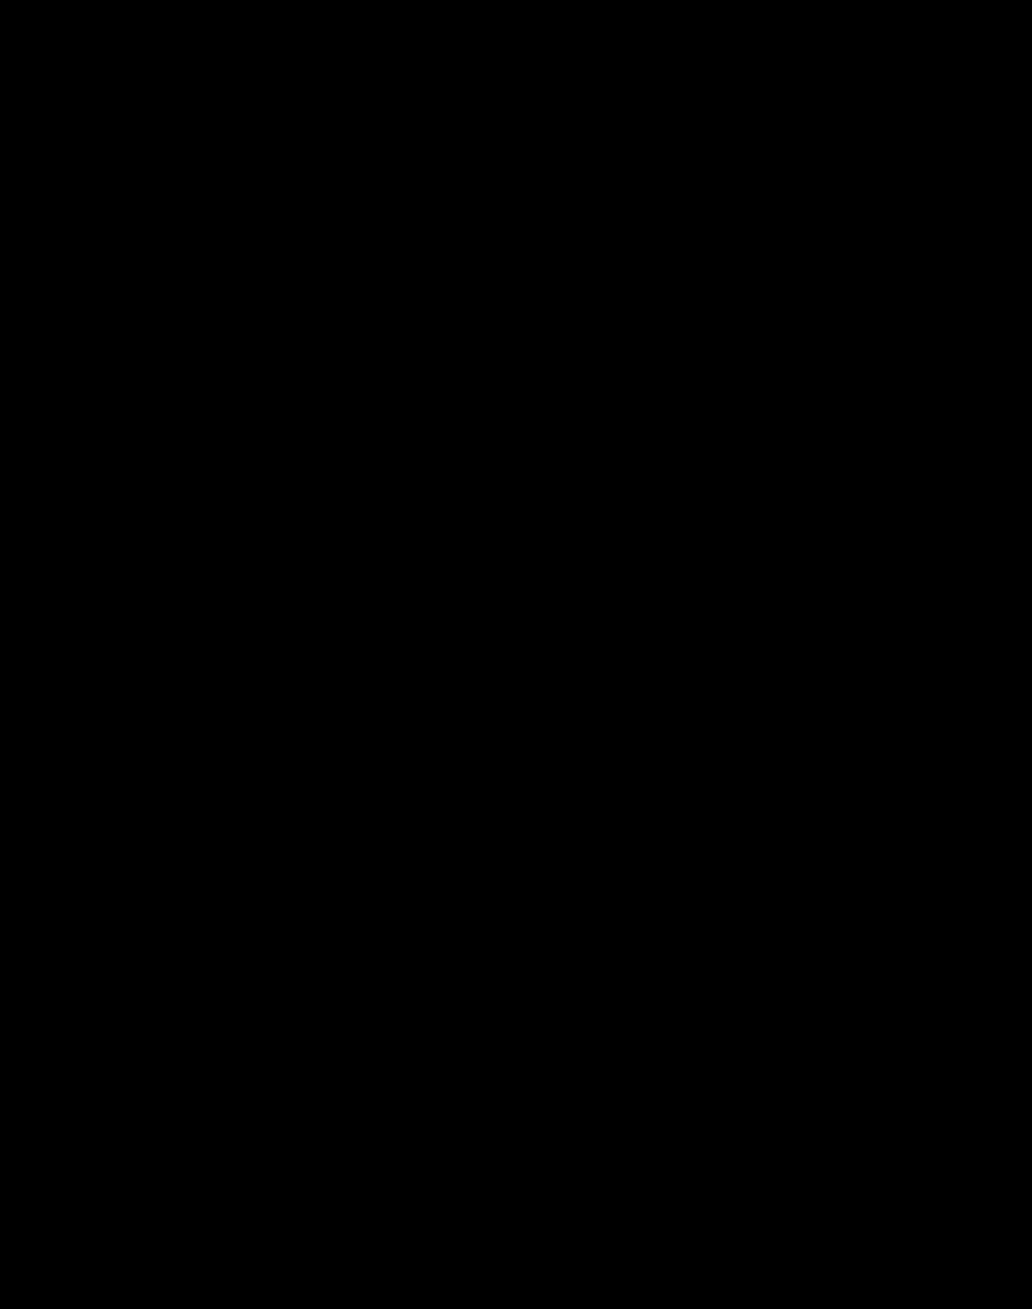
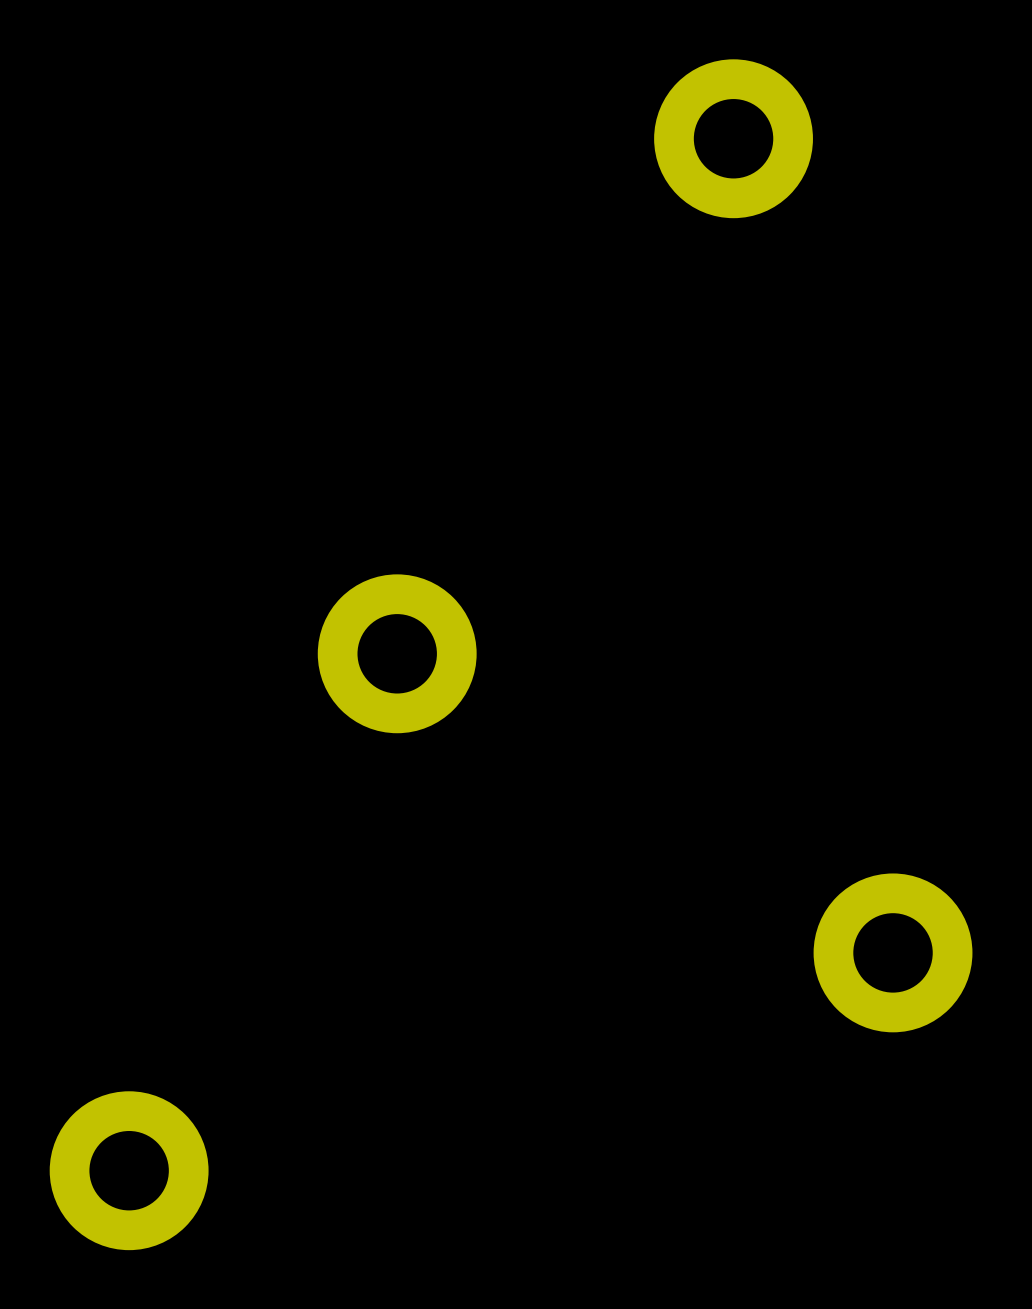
part: none -> (733, 138)
part: none -> (397, 653)
part: none -> (893, 952)
part: none -> (129, 1170)

